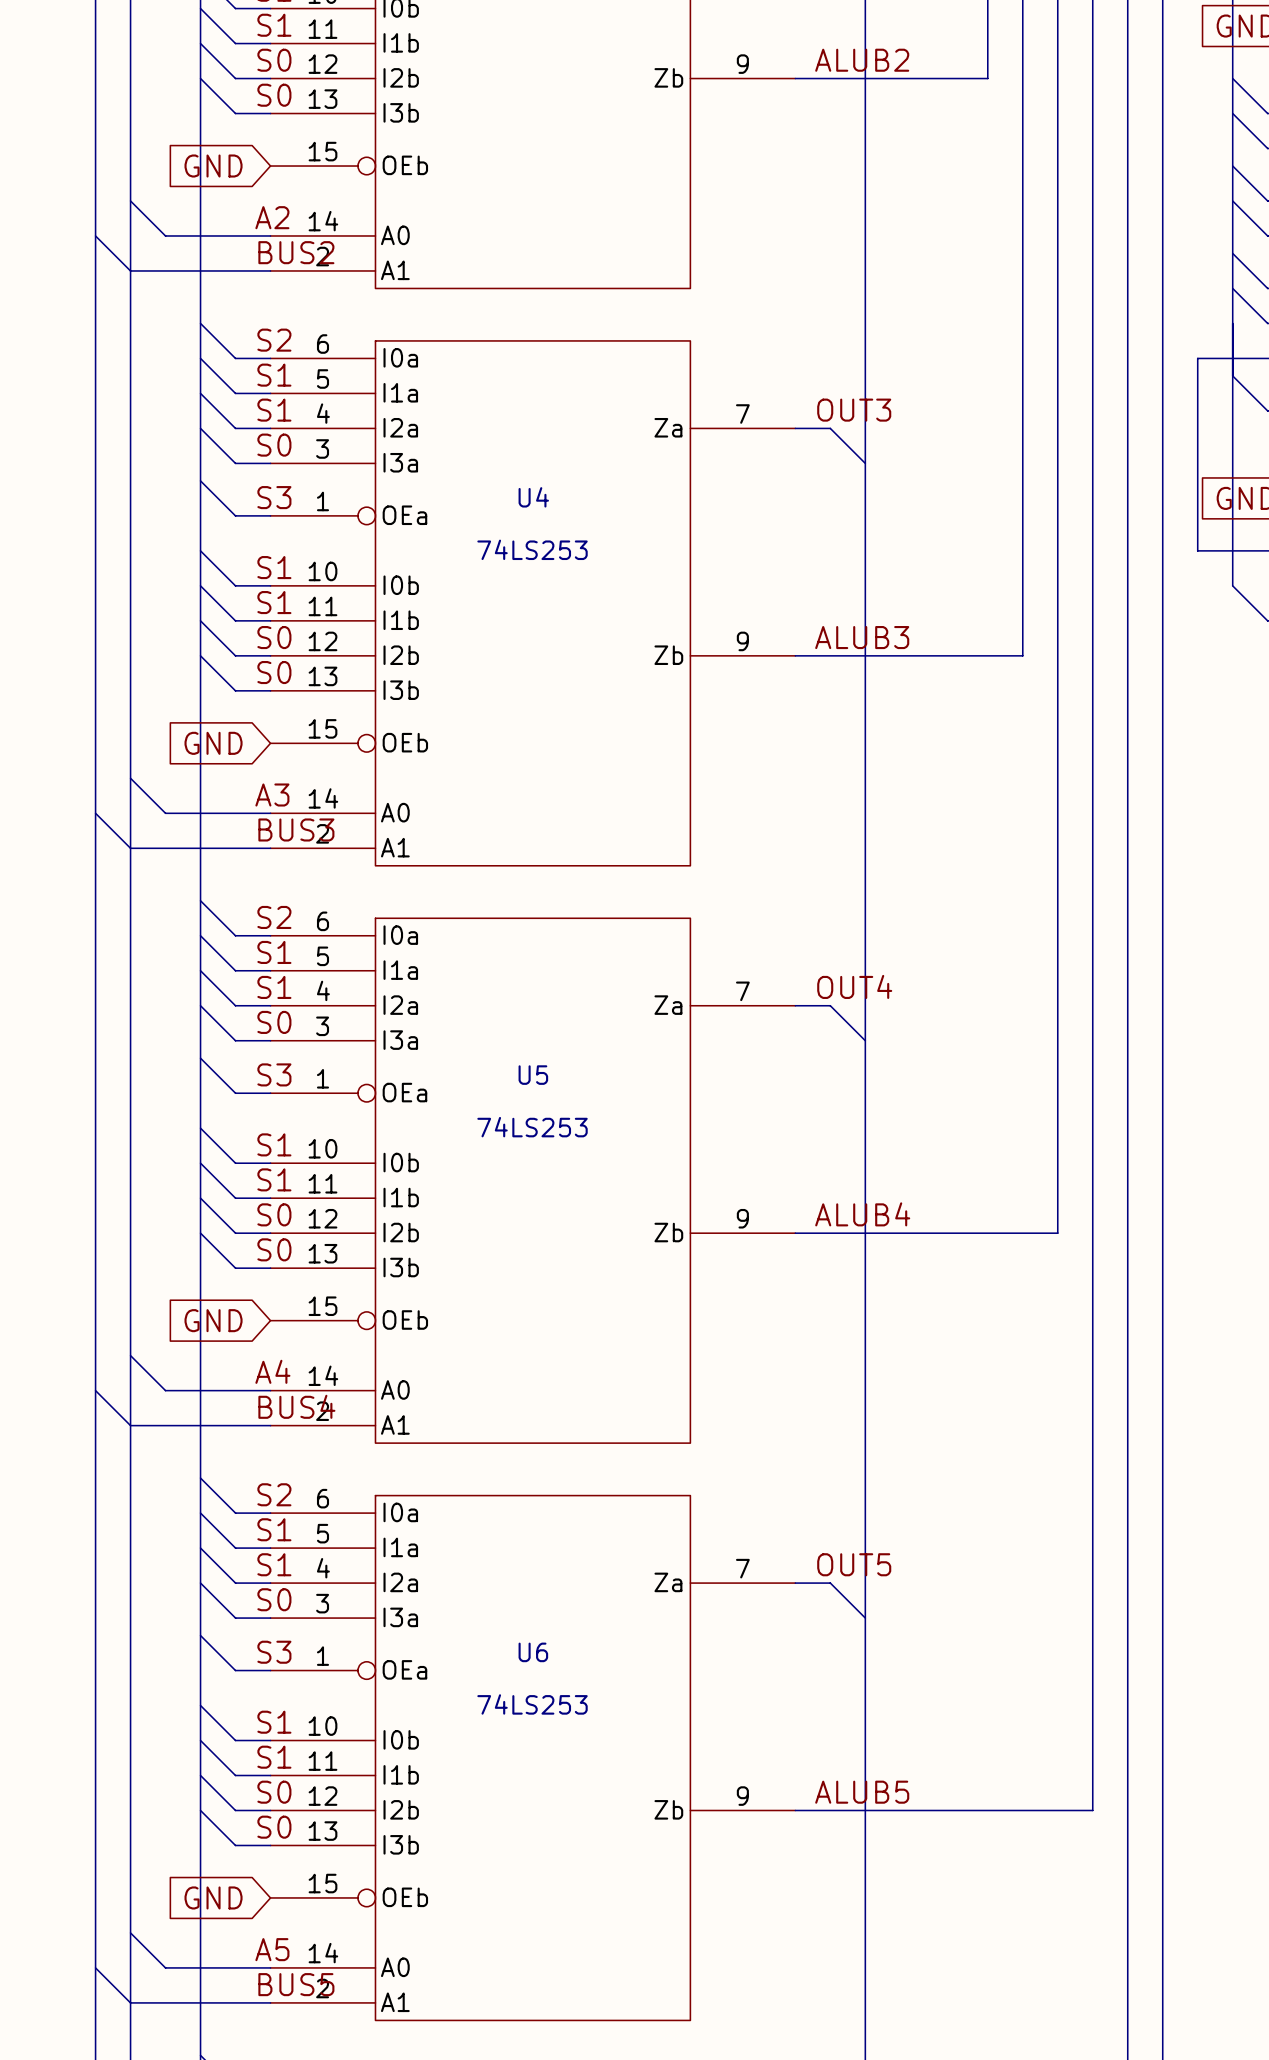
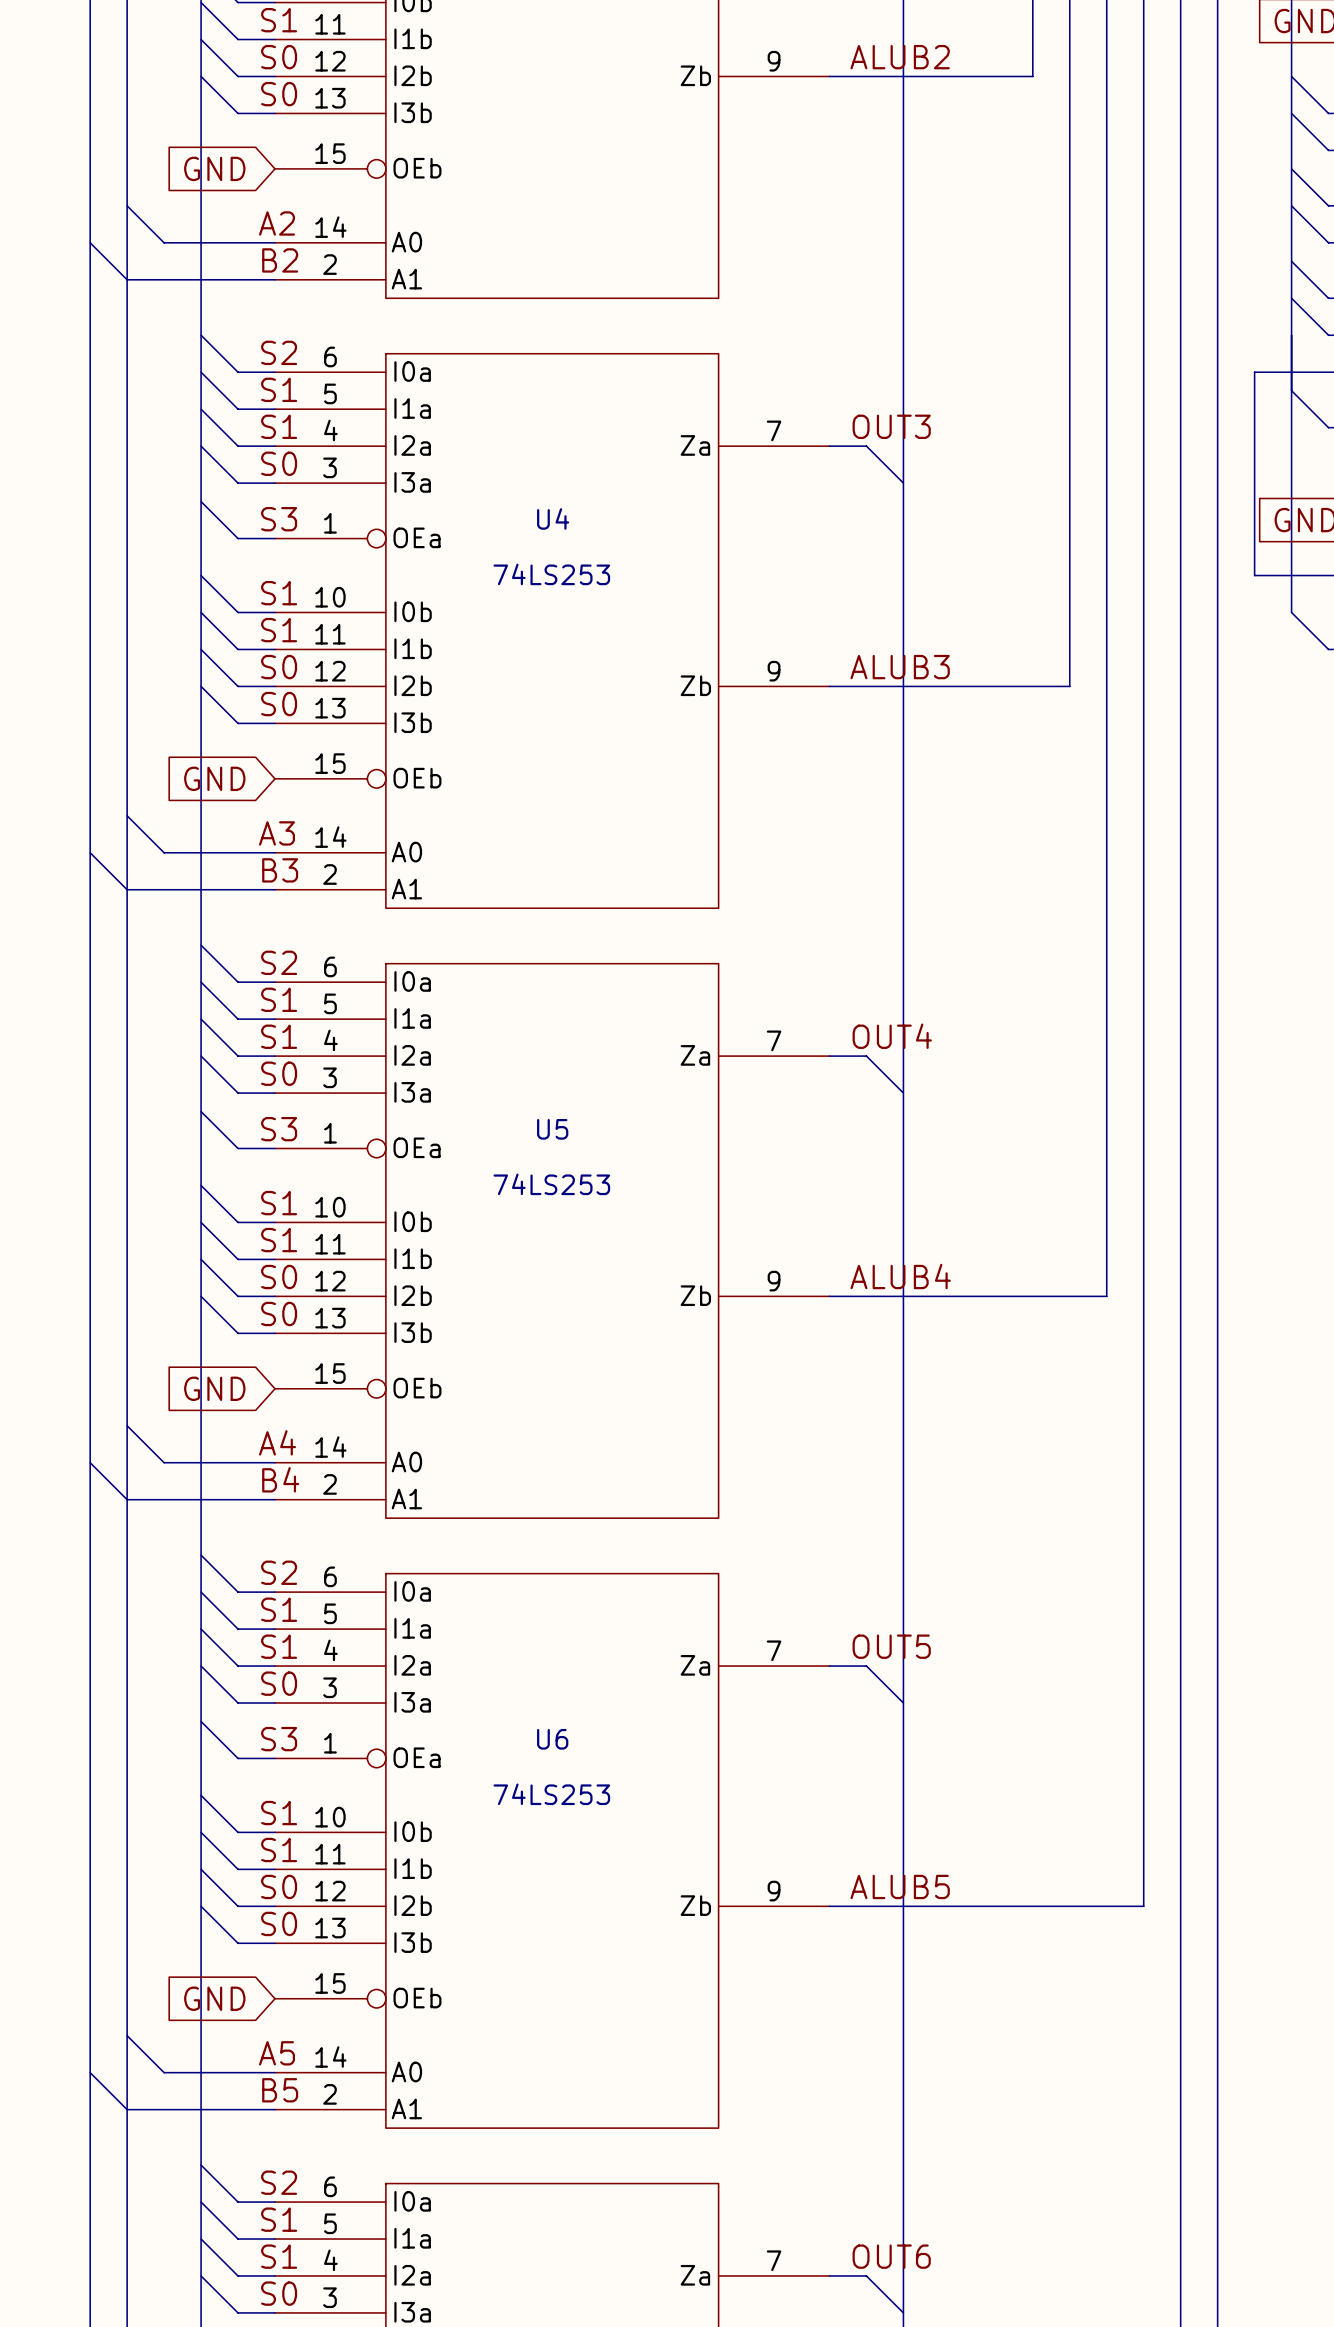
label: BUS2 (296, 252) -> B2 (280, 260)
label: BUS3 (296, 829) -> B3 (280, 870)
label: BUS4 (296, 1406) -> B4 (280, 1479)
label: BUS5 (296, 1984) -> B5 (280, 2090)

